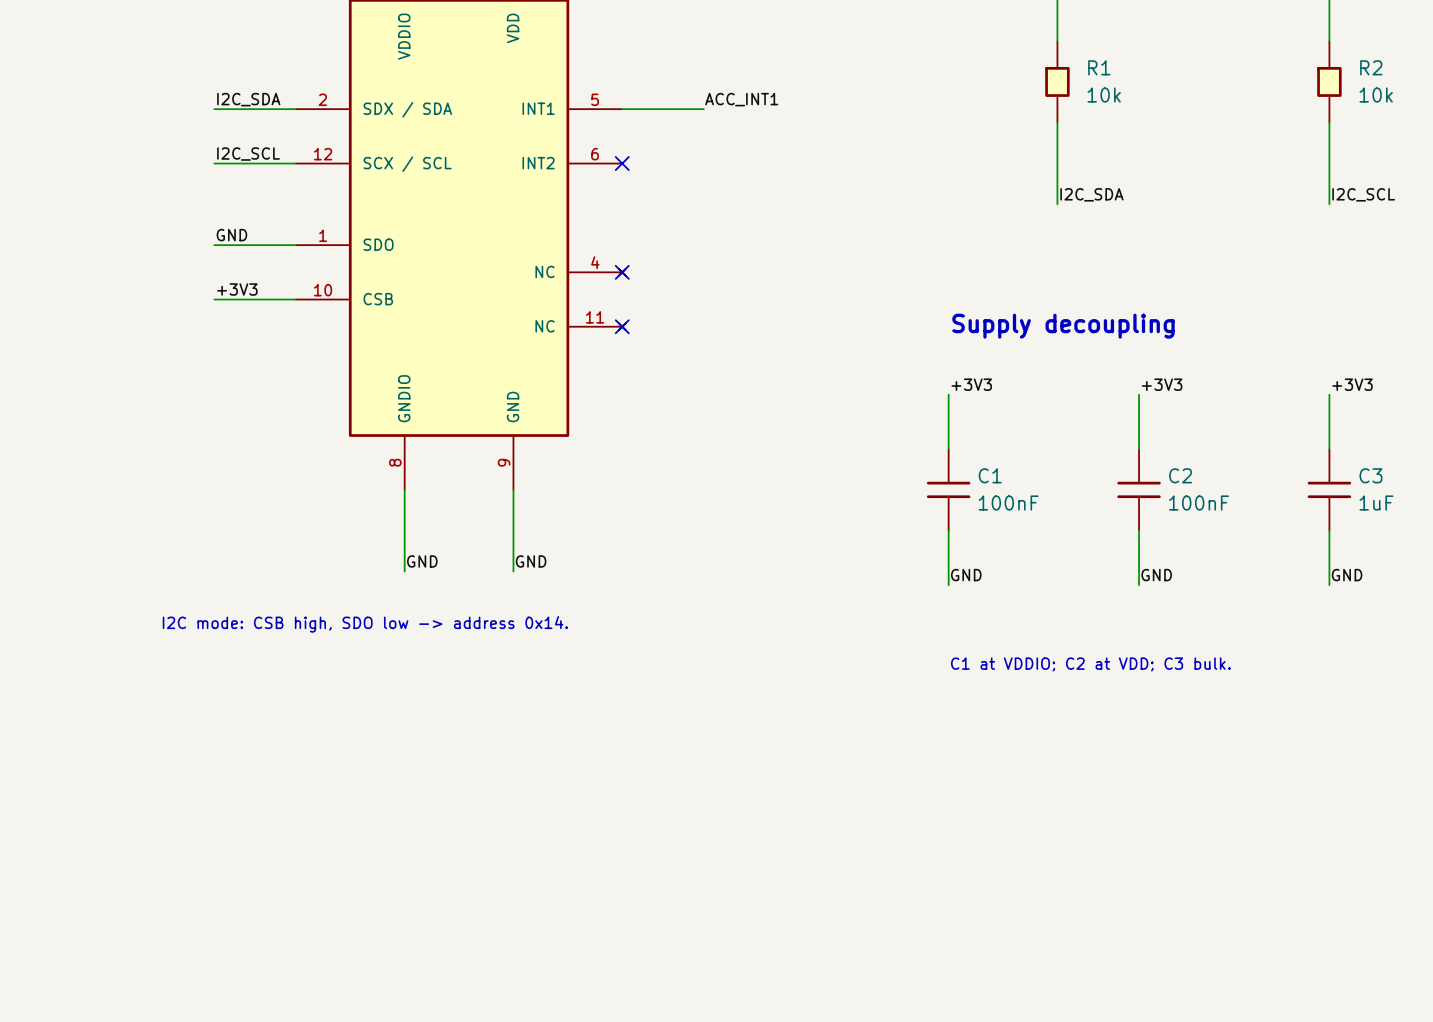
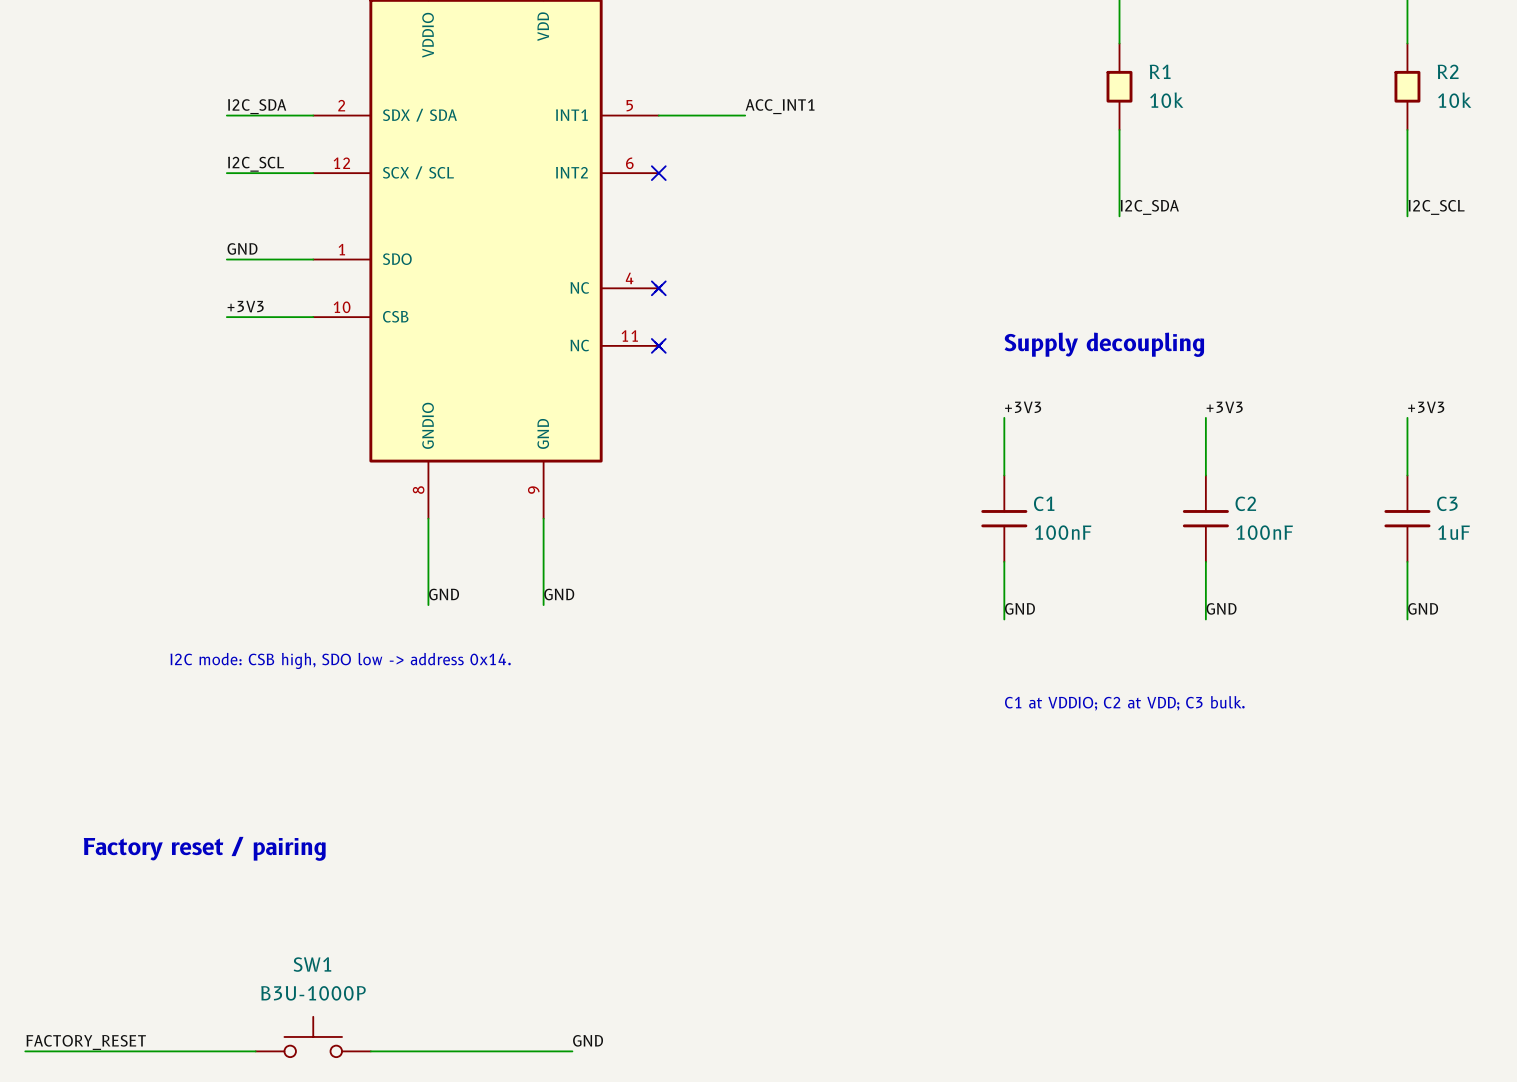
text: none -> Factory reset / pairing (204, 848)
SW1: none -> B3U-1000P (313, 1036)
label: none -> FACTORY_RESET (86, 1042)
label: none -> GND (588, 1040)
wire: none -> (25, 1051) (255, 1051)
wire: none -> (370, 1051) (572, 1051)

